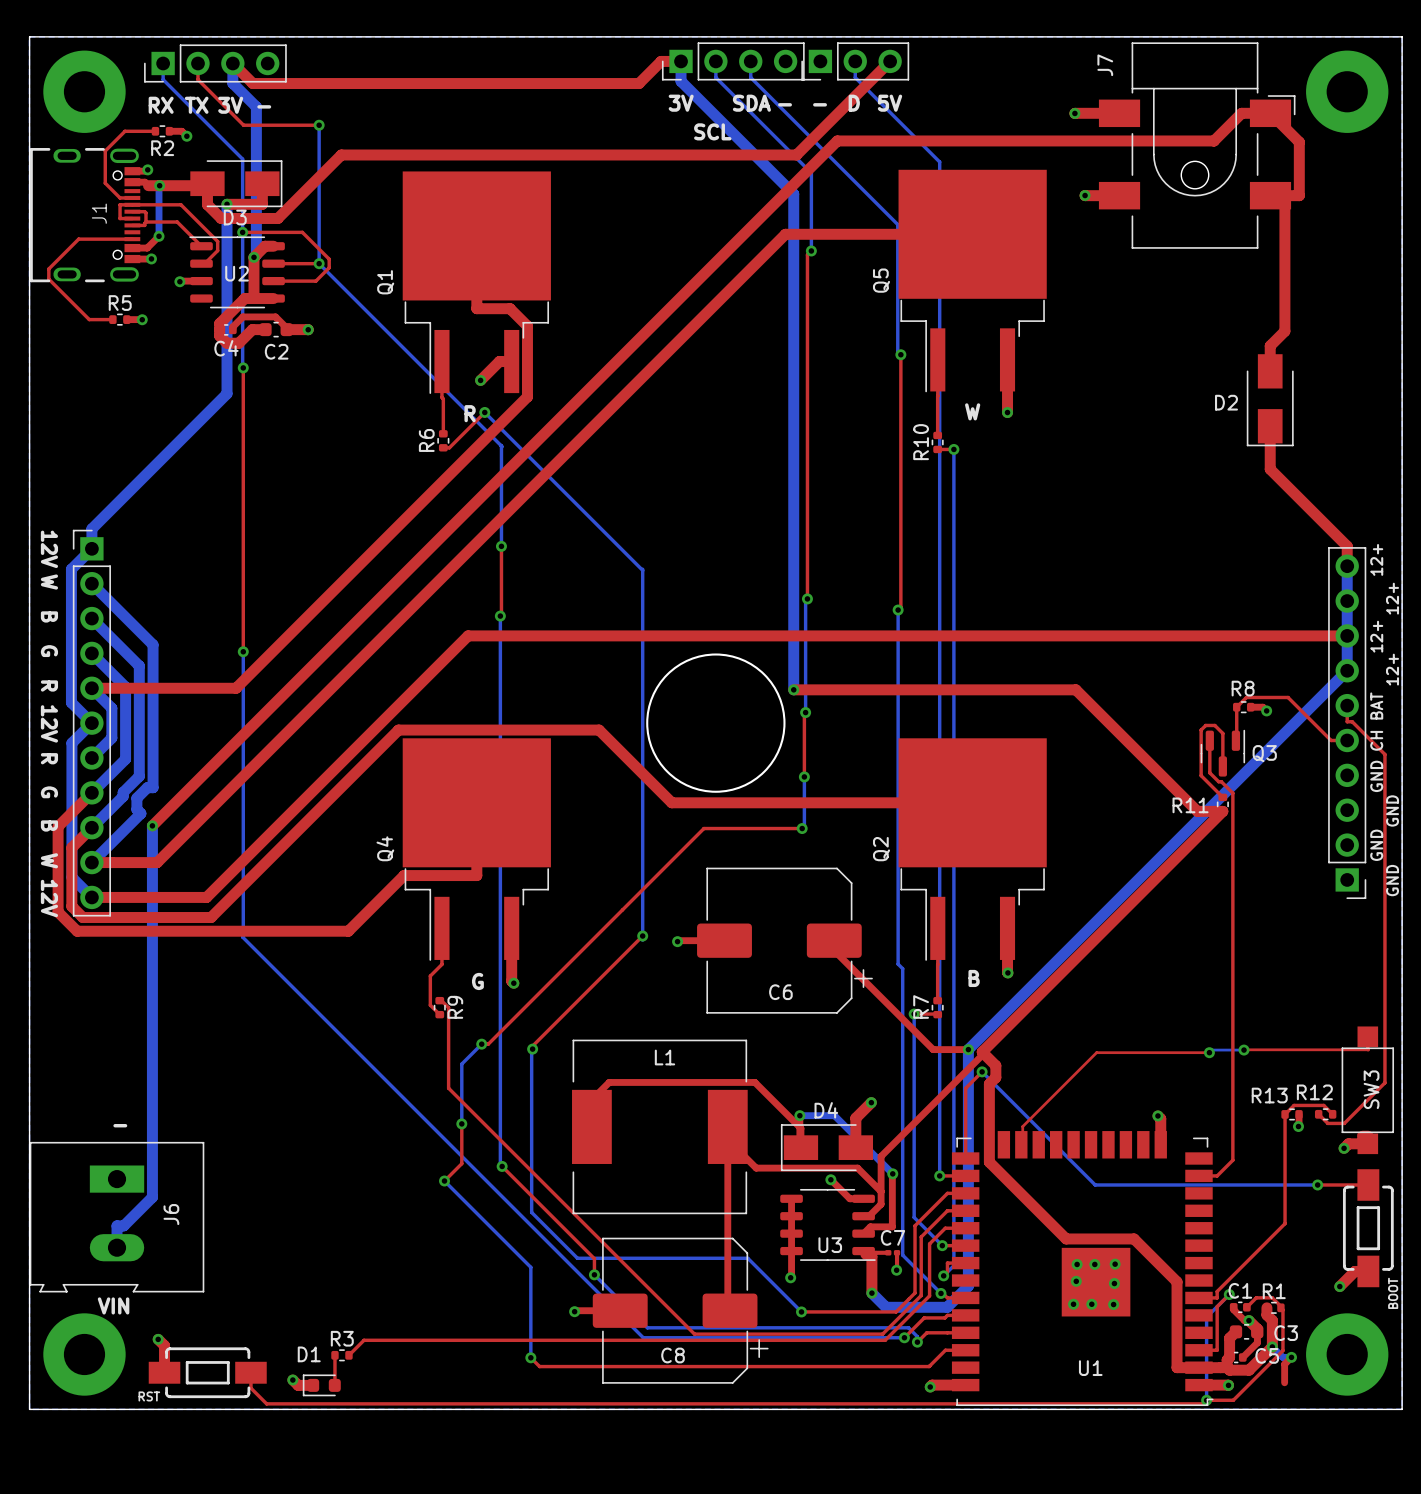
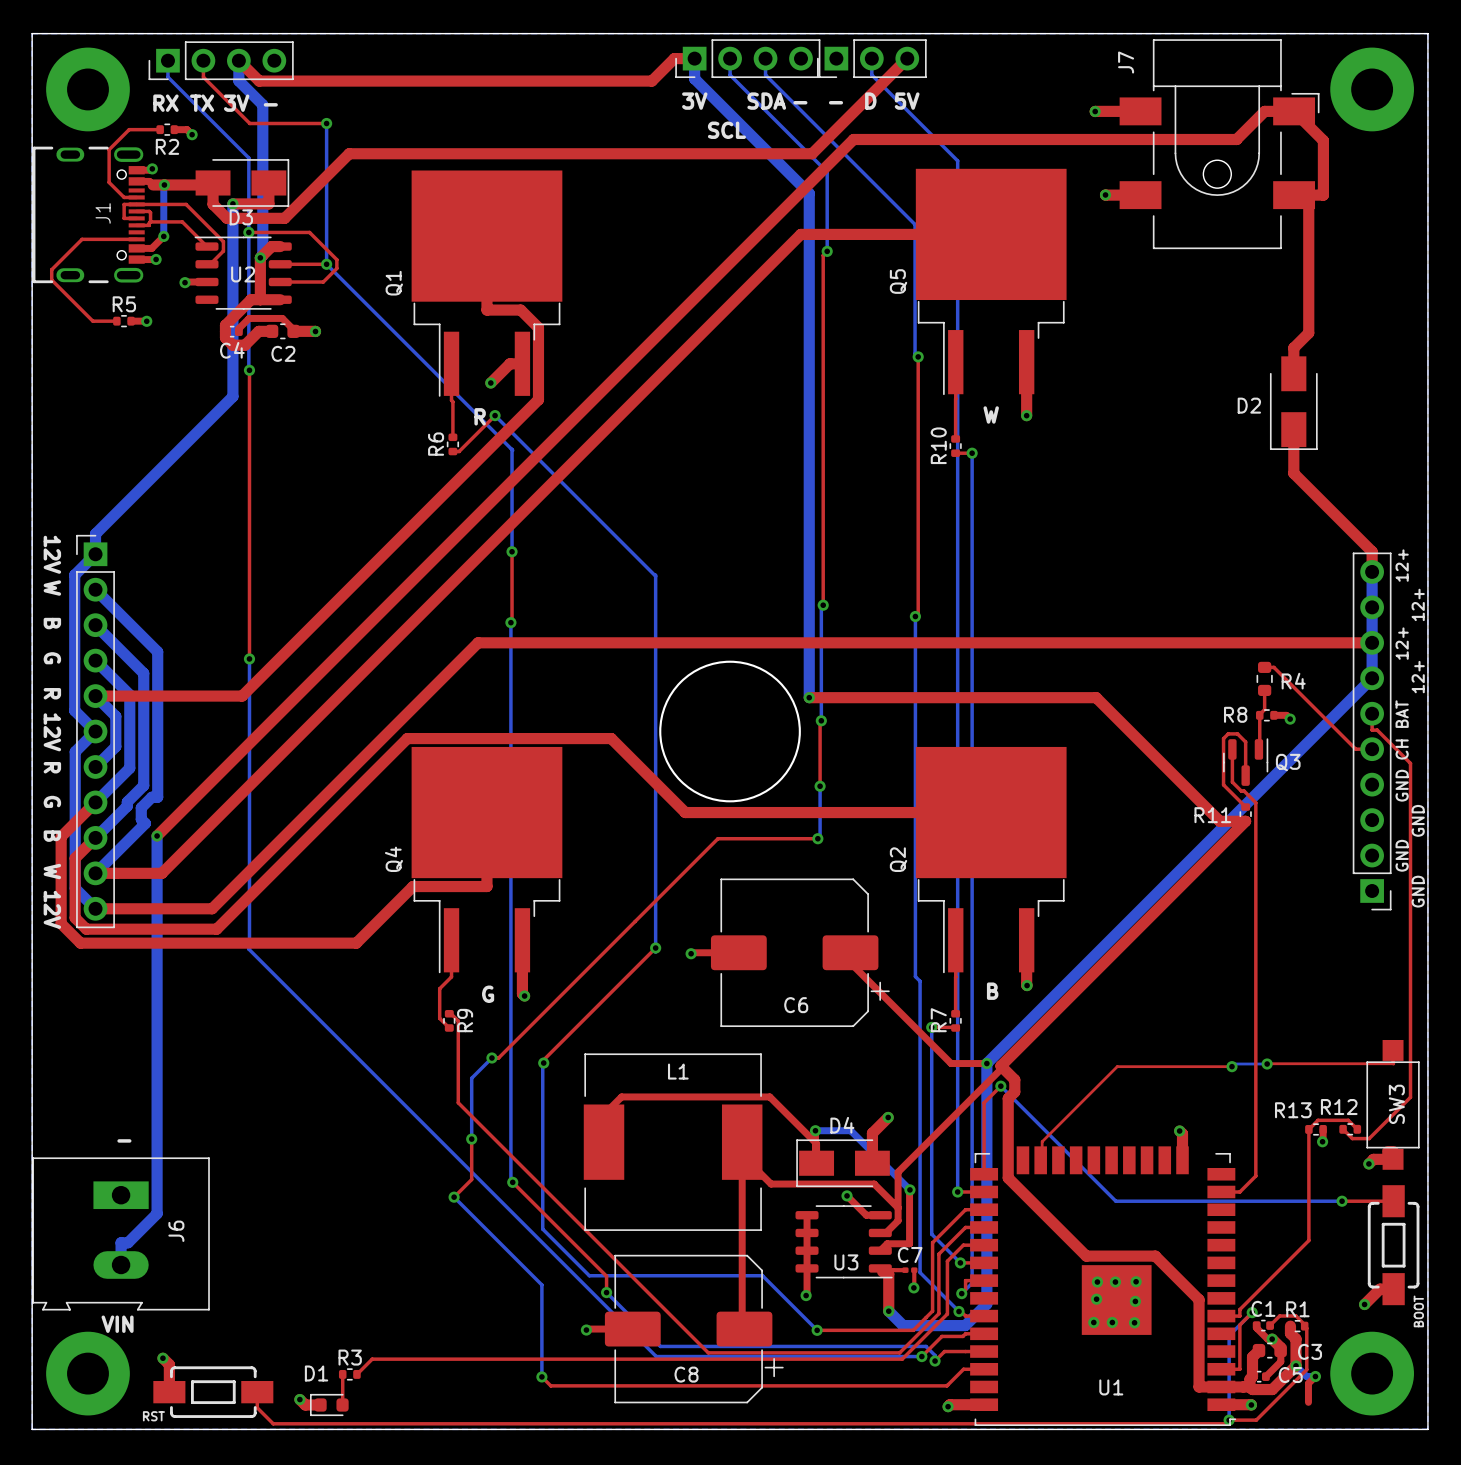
R4: none -> (1264, 678)
top track: none -> (1264, 690) (1264, 709) (1260, 714)
R8 name position: R8 (1243, 688) -> R8 (1235, 714)
top track: (1288, 697) (1246, 697) (1236, 707) -> (1311, 705) (1273, 667) (1264, 667)

